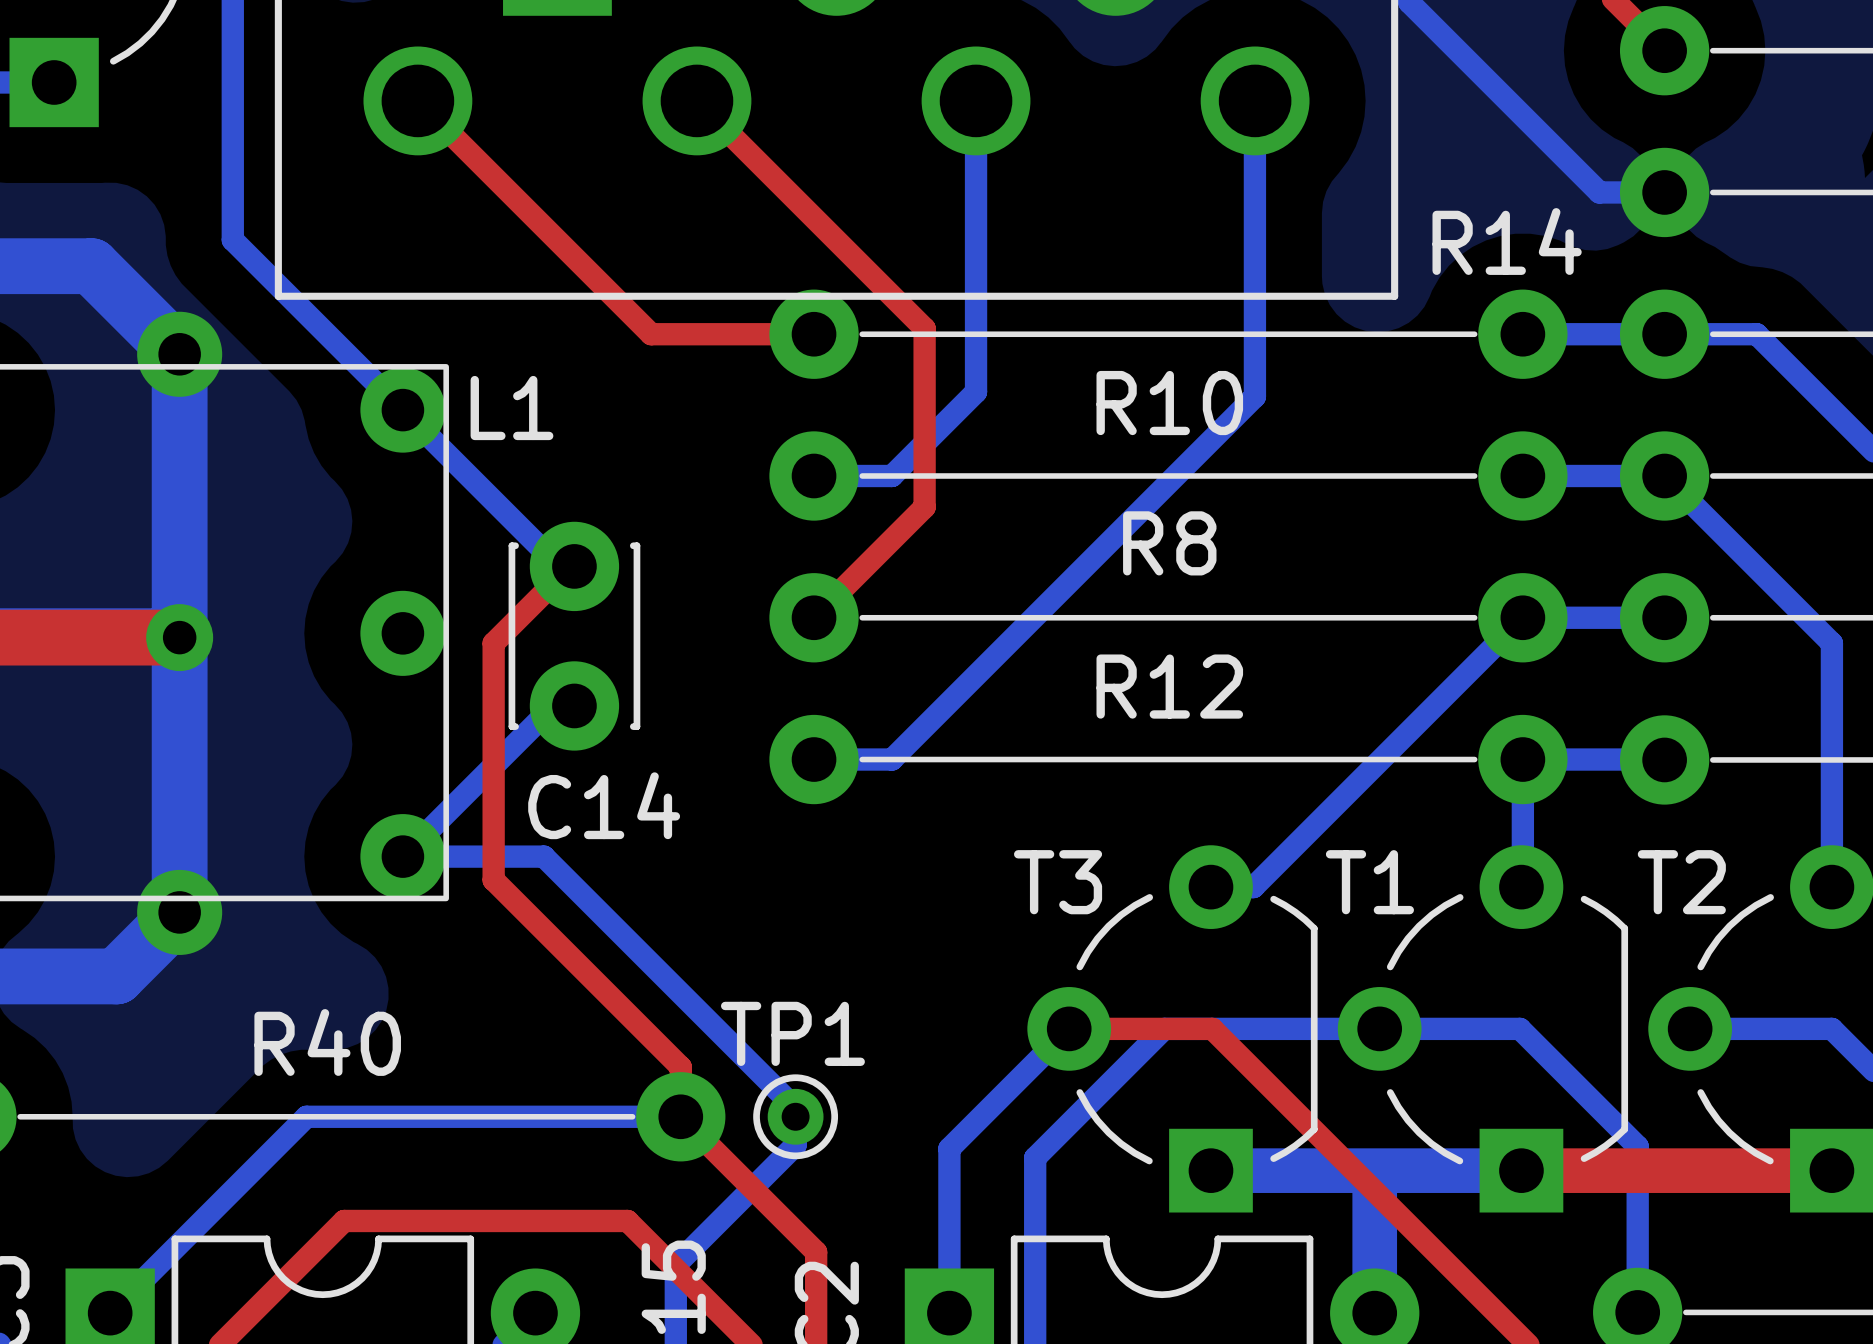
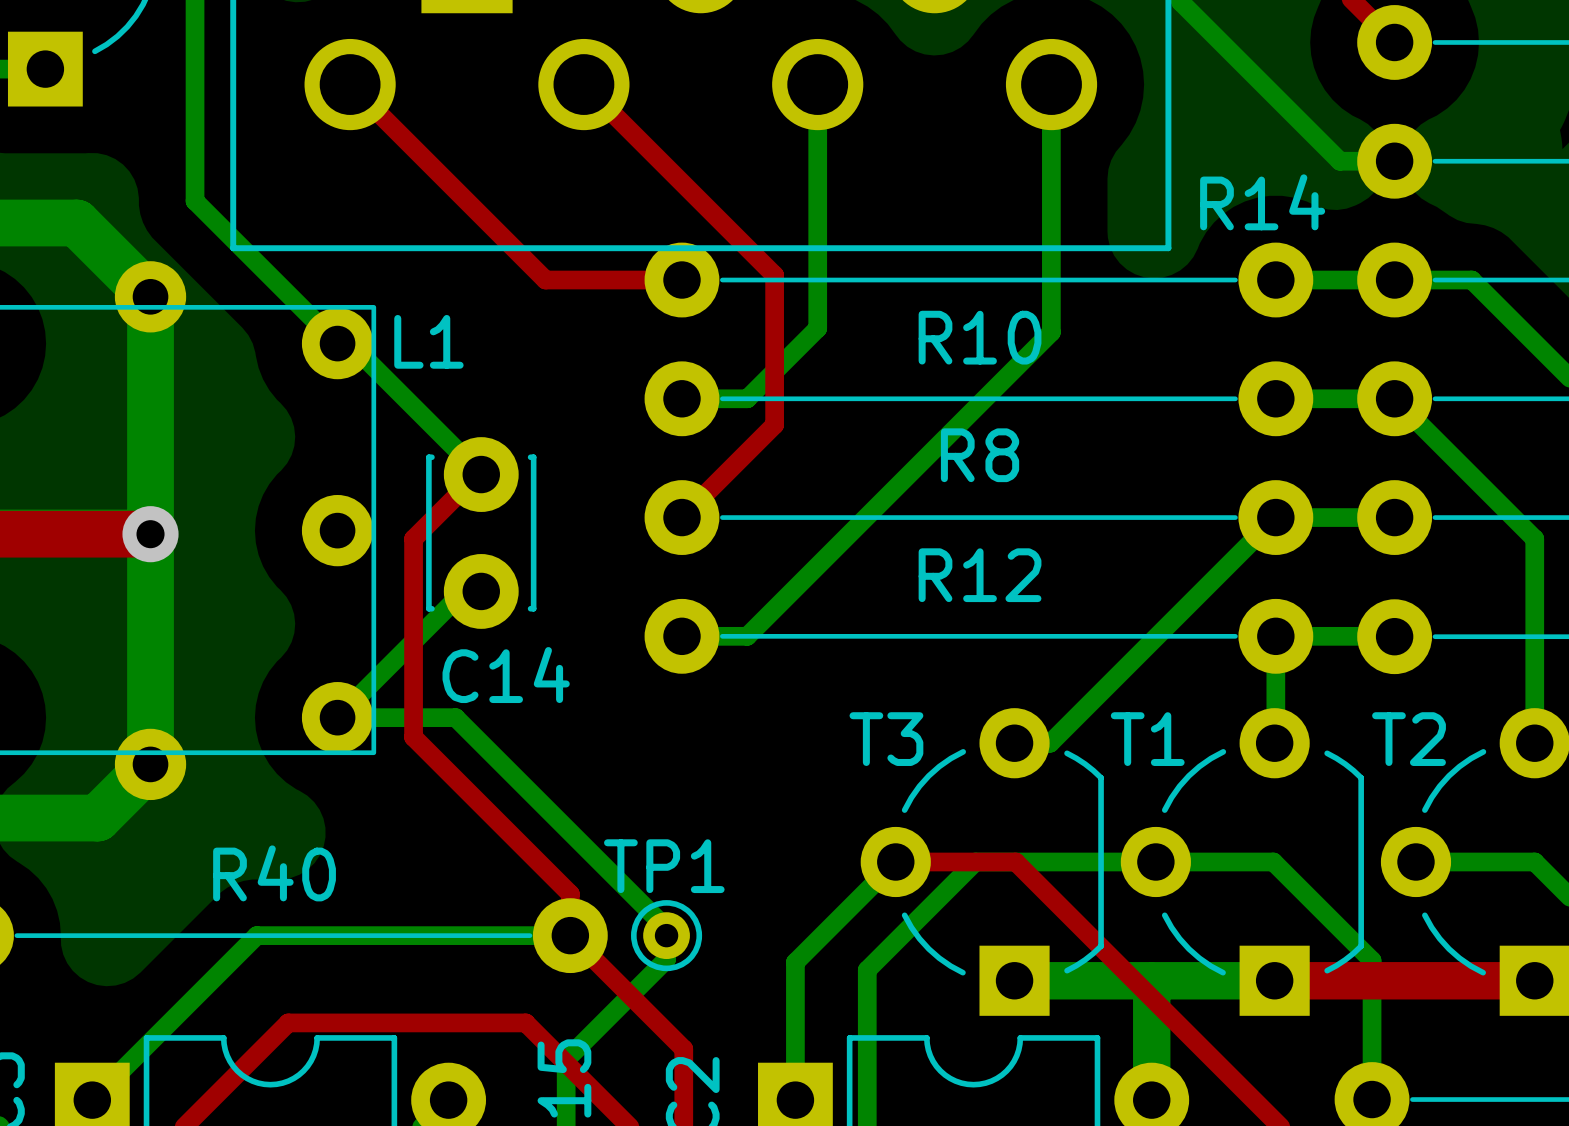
bottom track: (402, 410) (556, 563) -> (337, 343) (350, 343) (481, 474)

